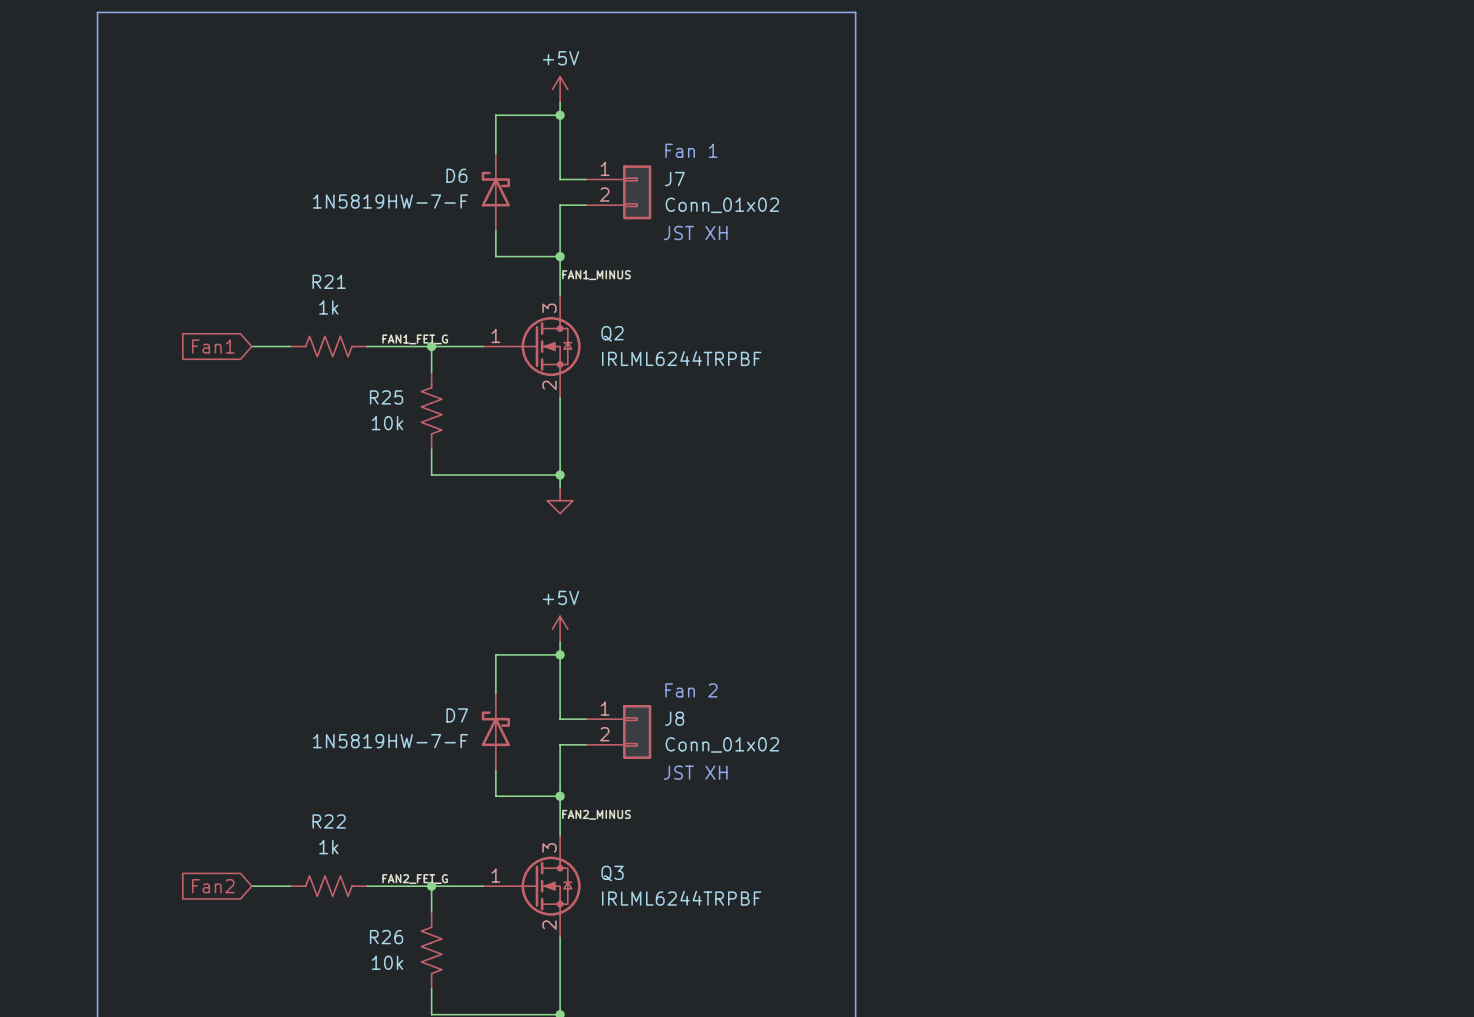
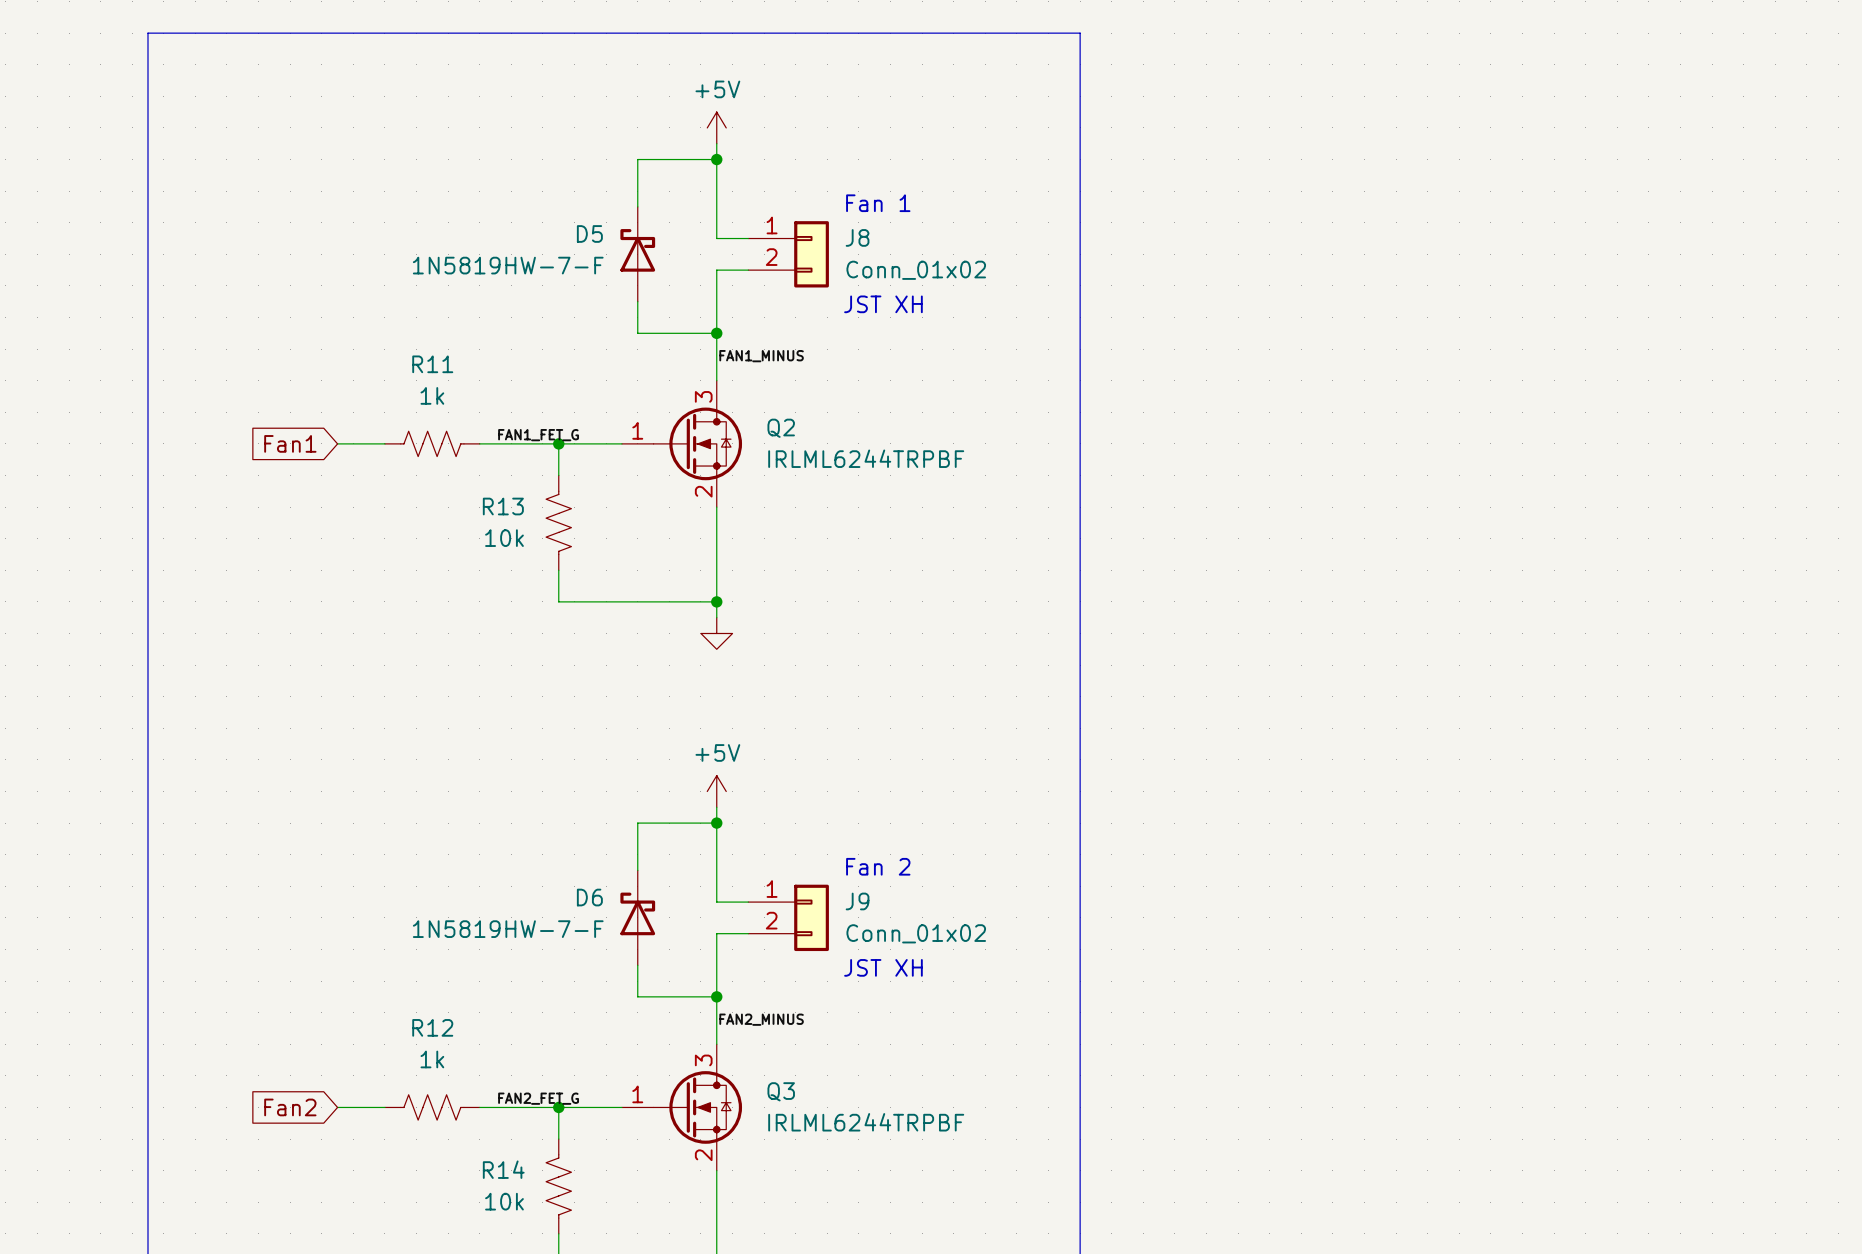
D6 name: D6 (456, 175) -> D5 (589, 233)
J7 name: J7 (674, 179) -> J8 (857, 237)
R21 name: R21 (329, 281) -> R11 (432, 364)
R25 name: R25 (386, 397) -> R13 (503, 506)
D7 name: D7 (457, 715) -> D6 (589, 897)
J8 name: J8 (674, 718) -> J9 (857, 901)
R22 name: R22 (329, 821) -> R12 (432, 1027)
R26 name: R26 (386, 937) -> R14 (503, 1169)

